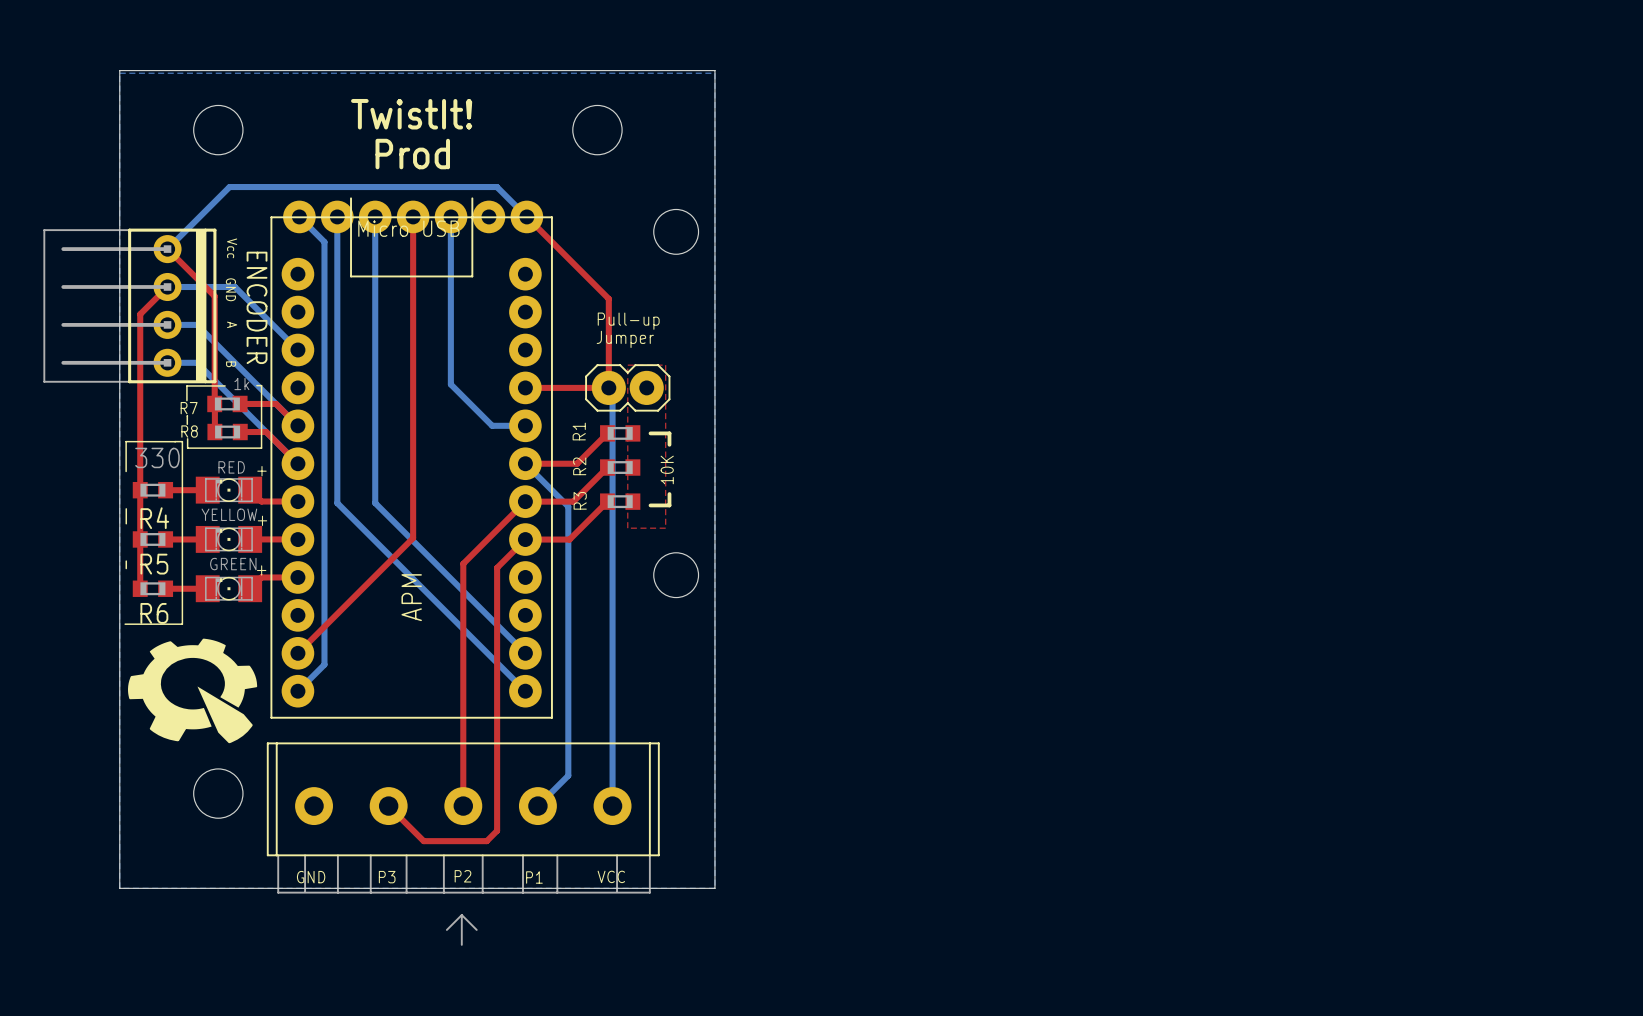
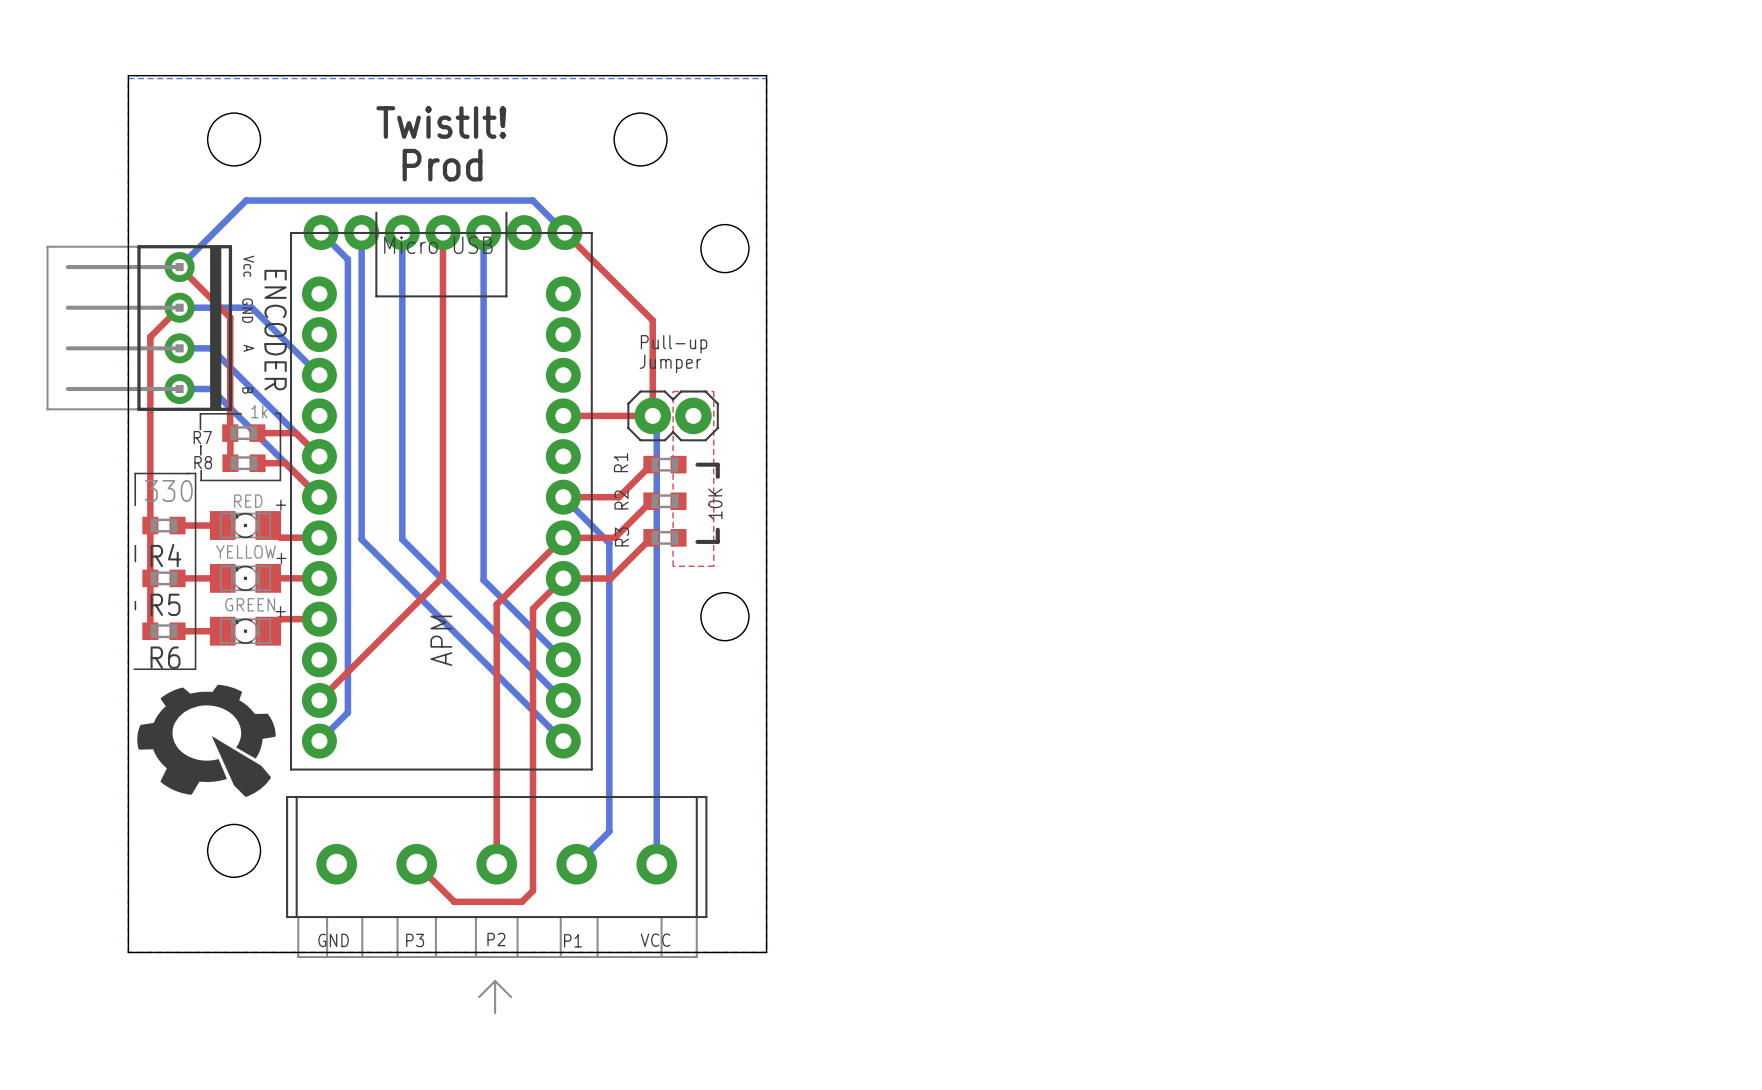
bottom track: (450, 217) (450, 384) (492, 425) (525, 425) -> (483, 232) (483, 580) (563, 659)

